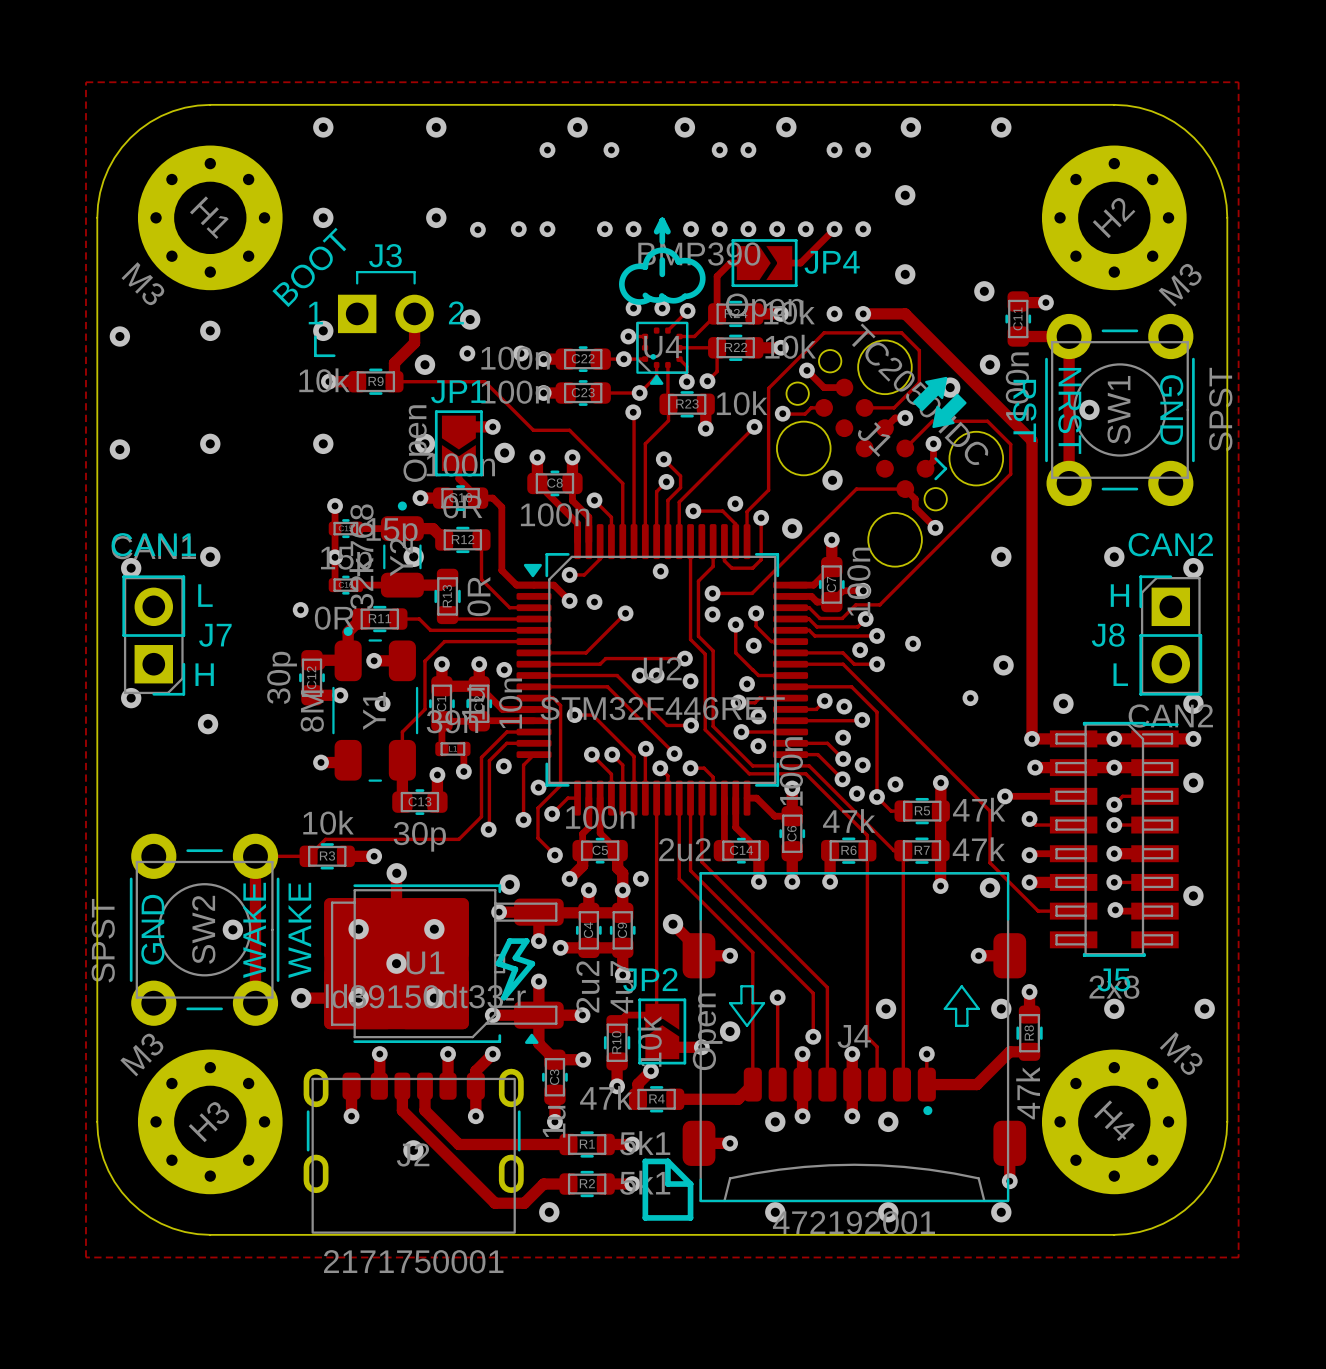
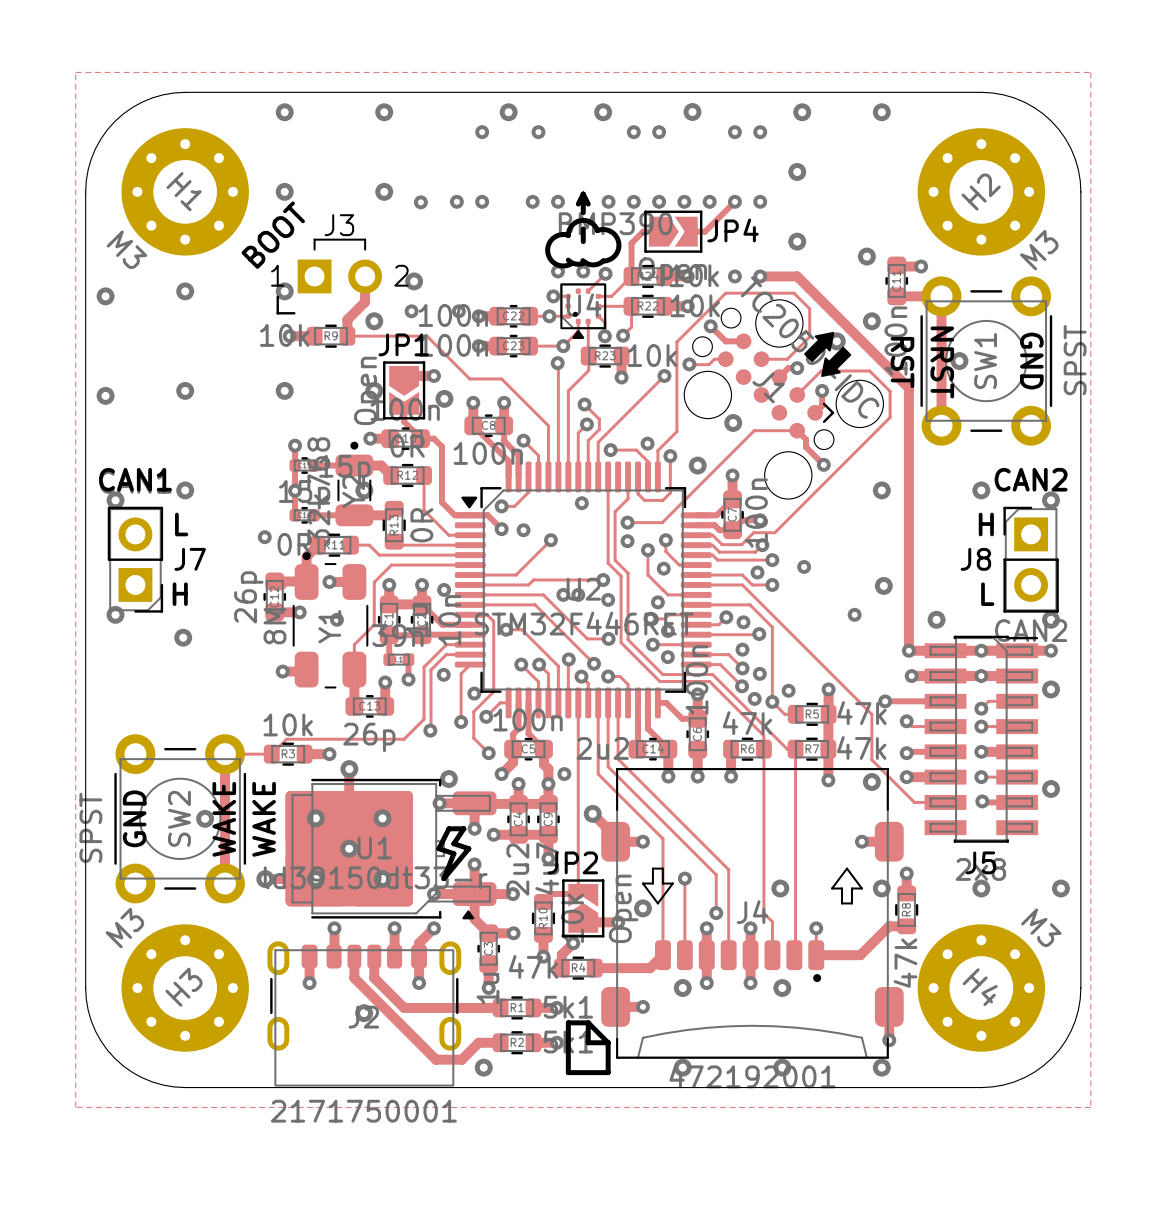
C12 value: 30p (282, 677) -> 26p (248, 597)
C13 value: 30p (419, 836) -> 26p (369, 737)

